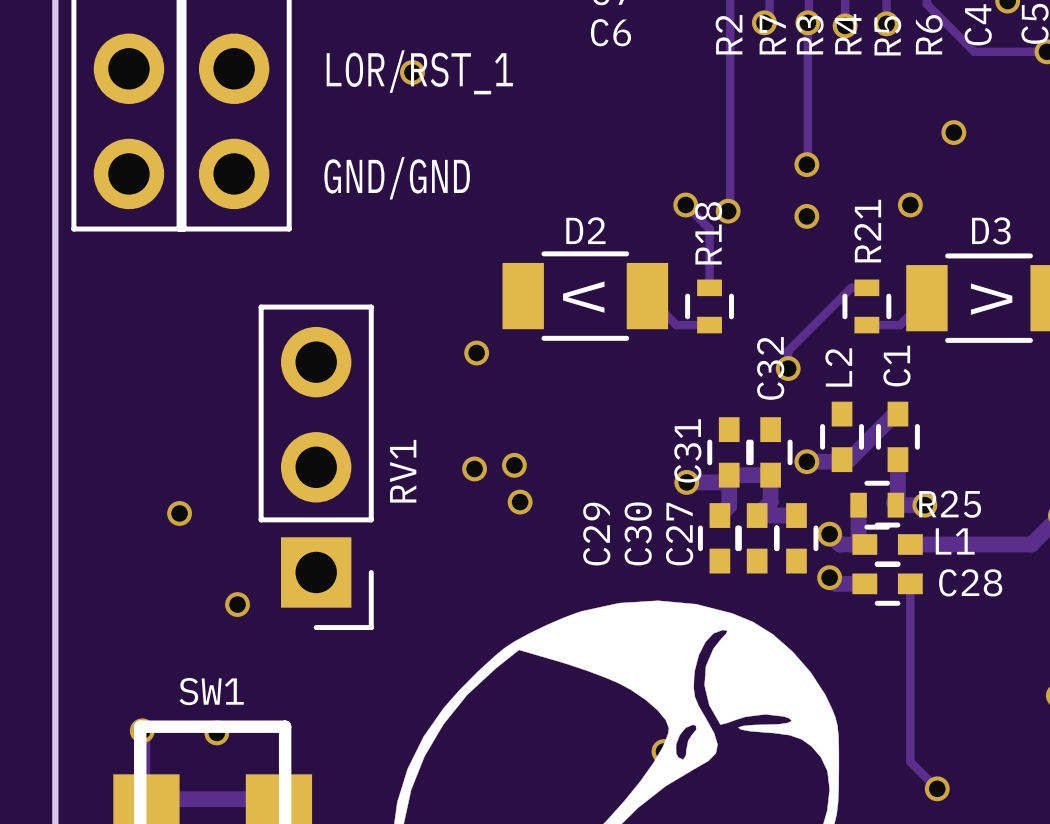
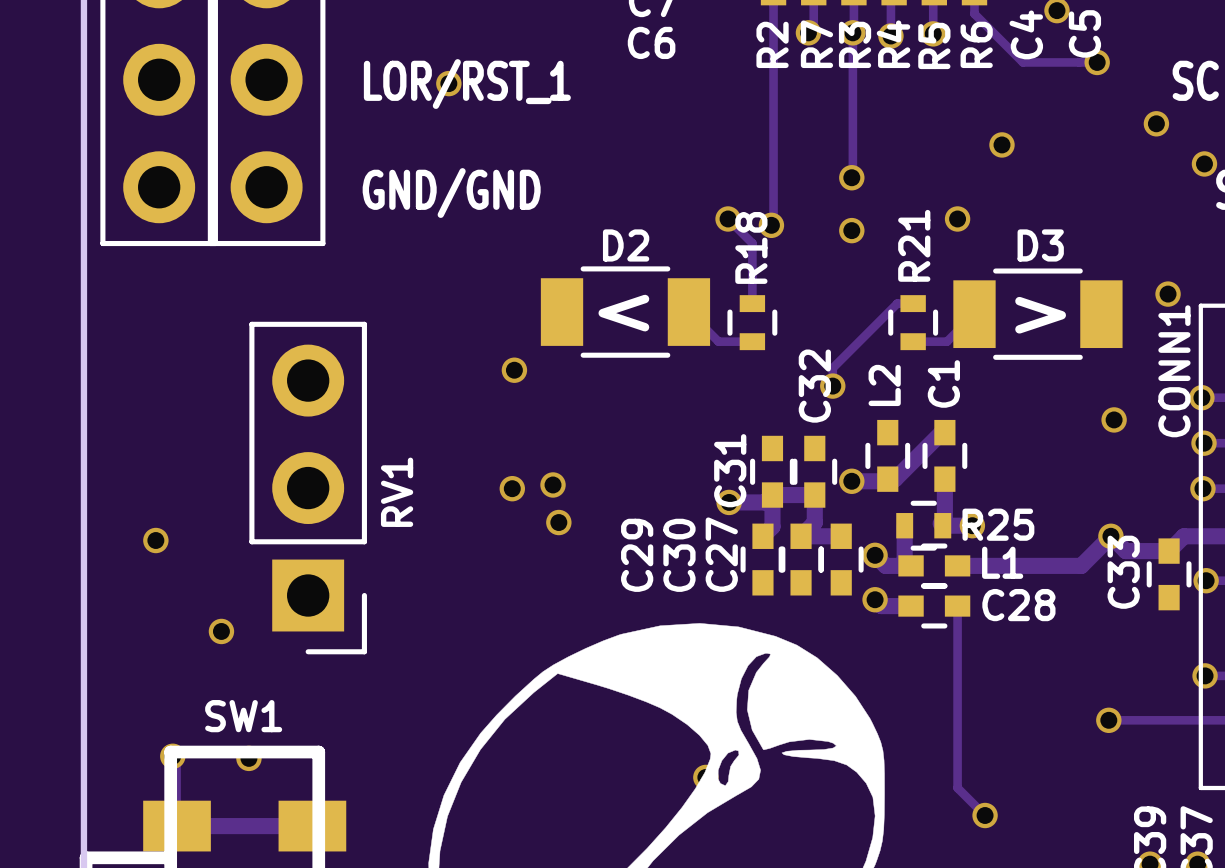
RV1 position: (316, 467) -> (308, 488)
via: (179, 513) -> none
via: none -> (155, 540)
via: (237, 604) -> none
via: none -> (221, 631)

